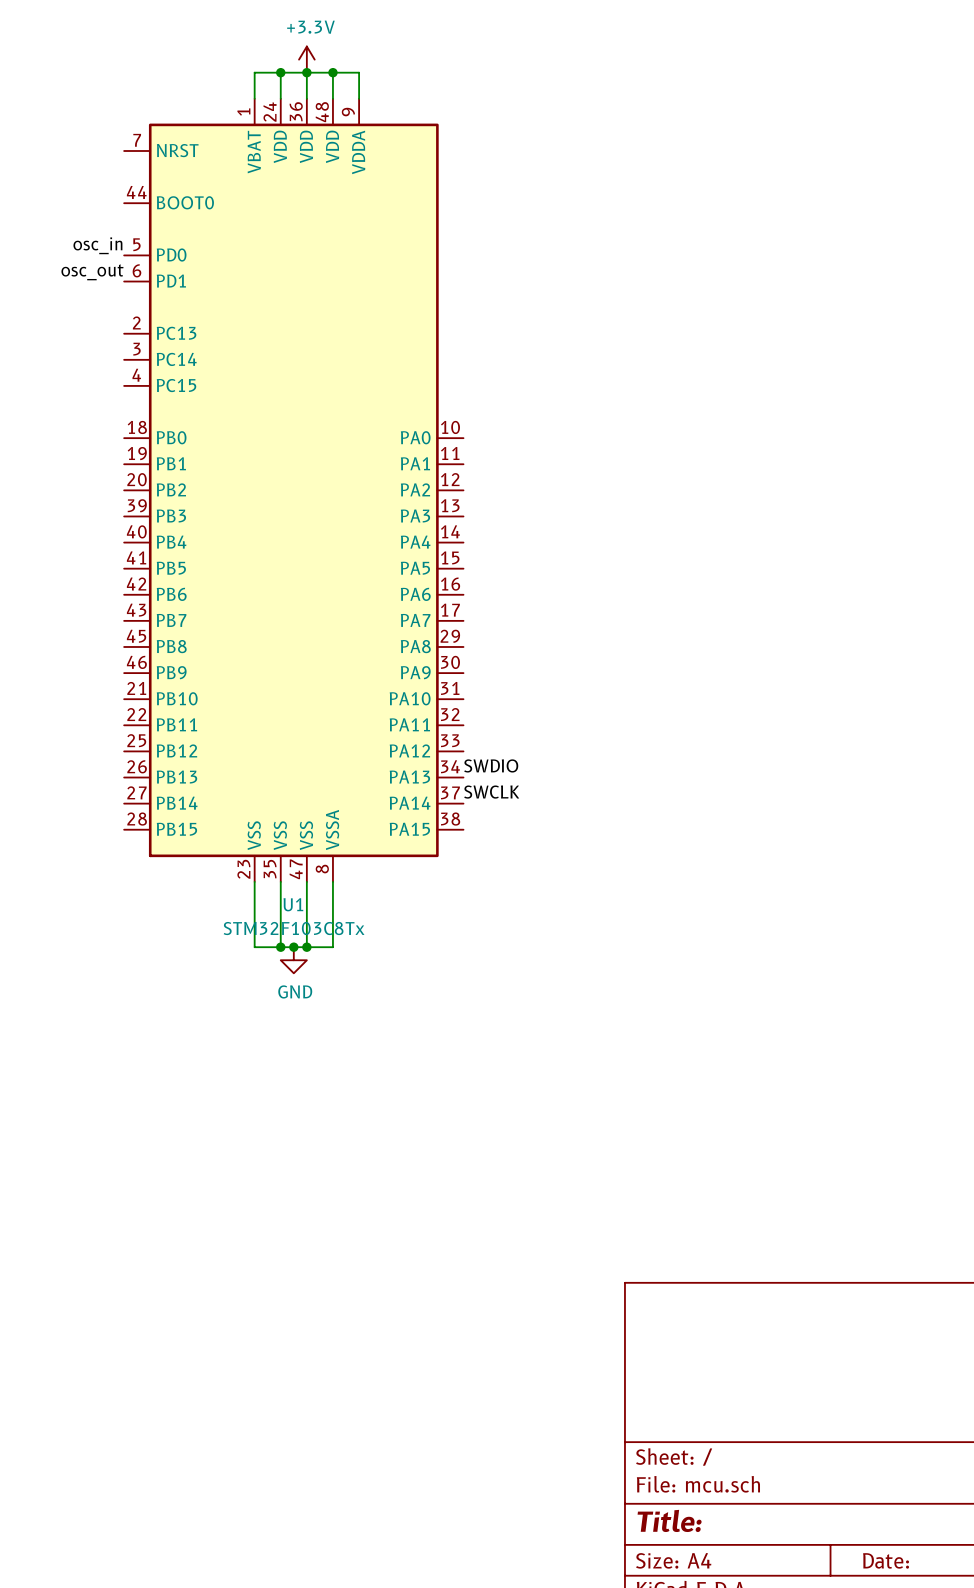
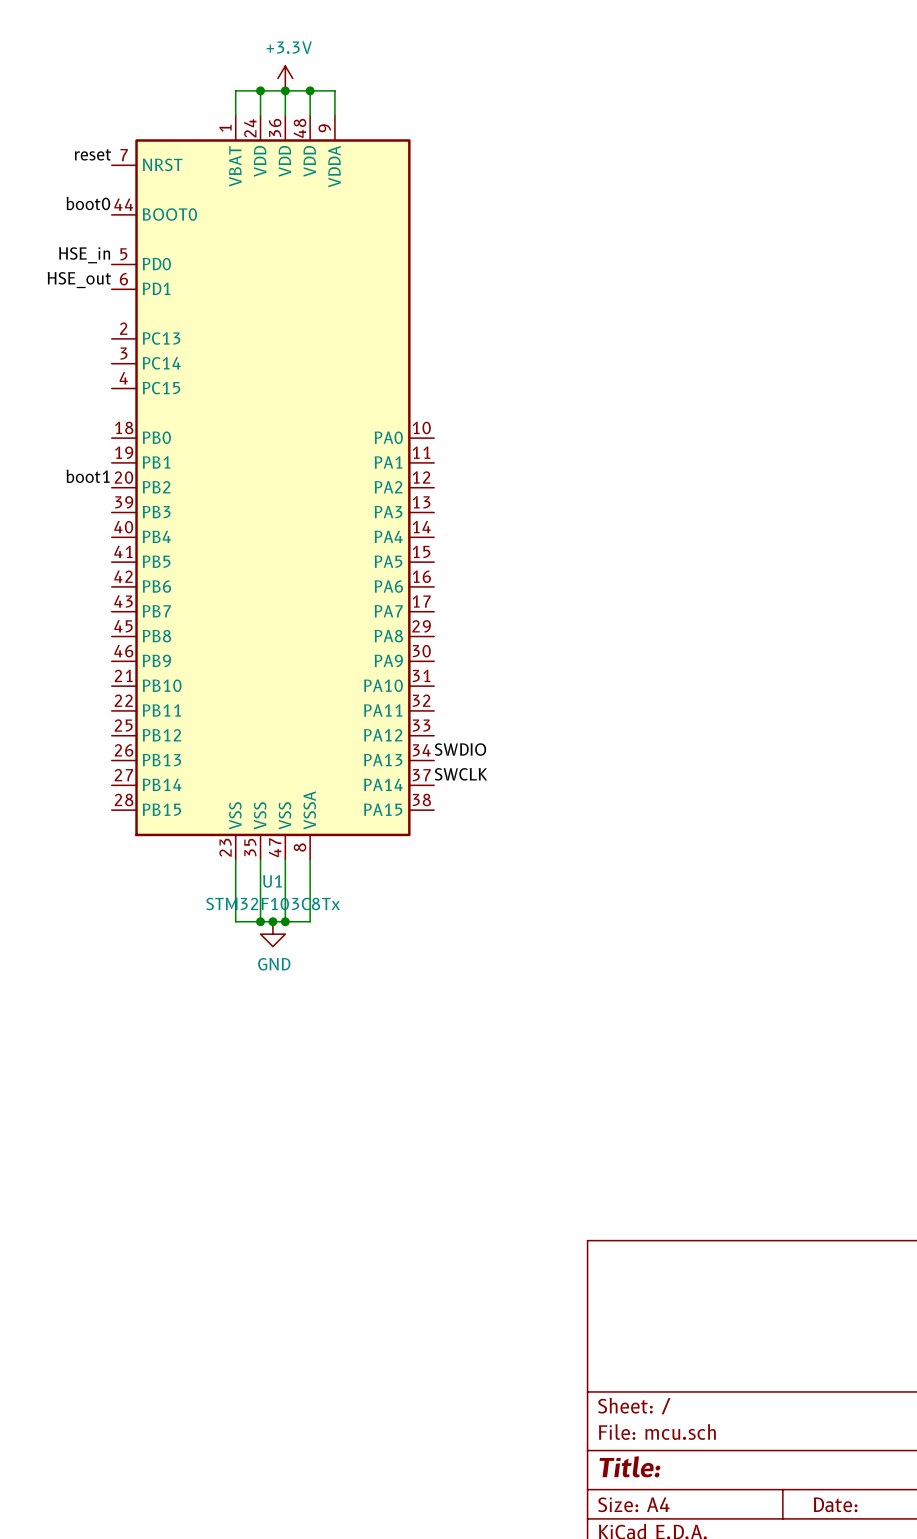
label: none -> reset (93, 154)
label: none -> boot0 (88, 203)
label: osc_in (97, 245) -> HSE_in (84, 255)
label: osc_out (92, 272) -> HSE_out (79, 280)
label: none -> boot1 (88, 476)

